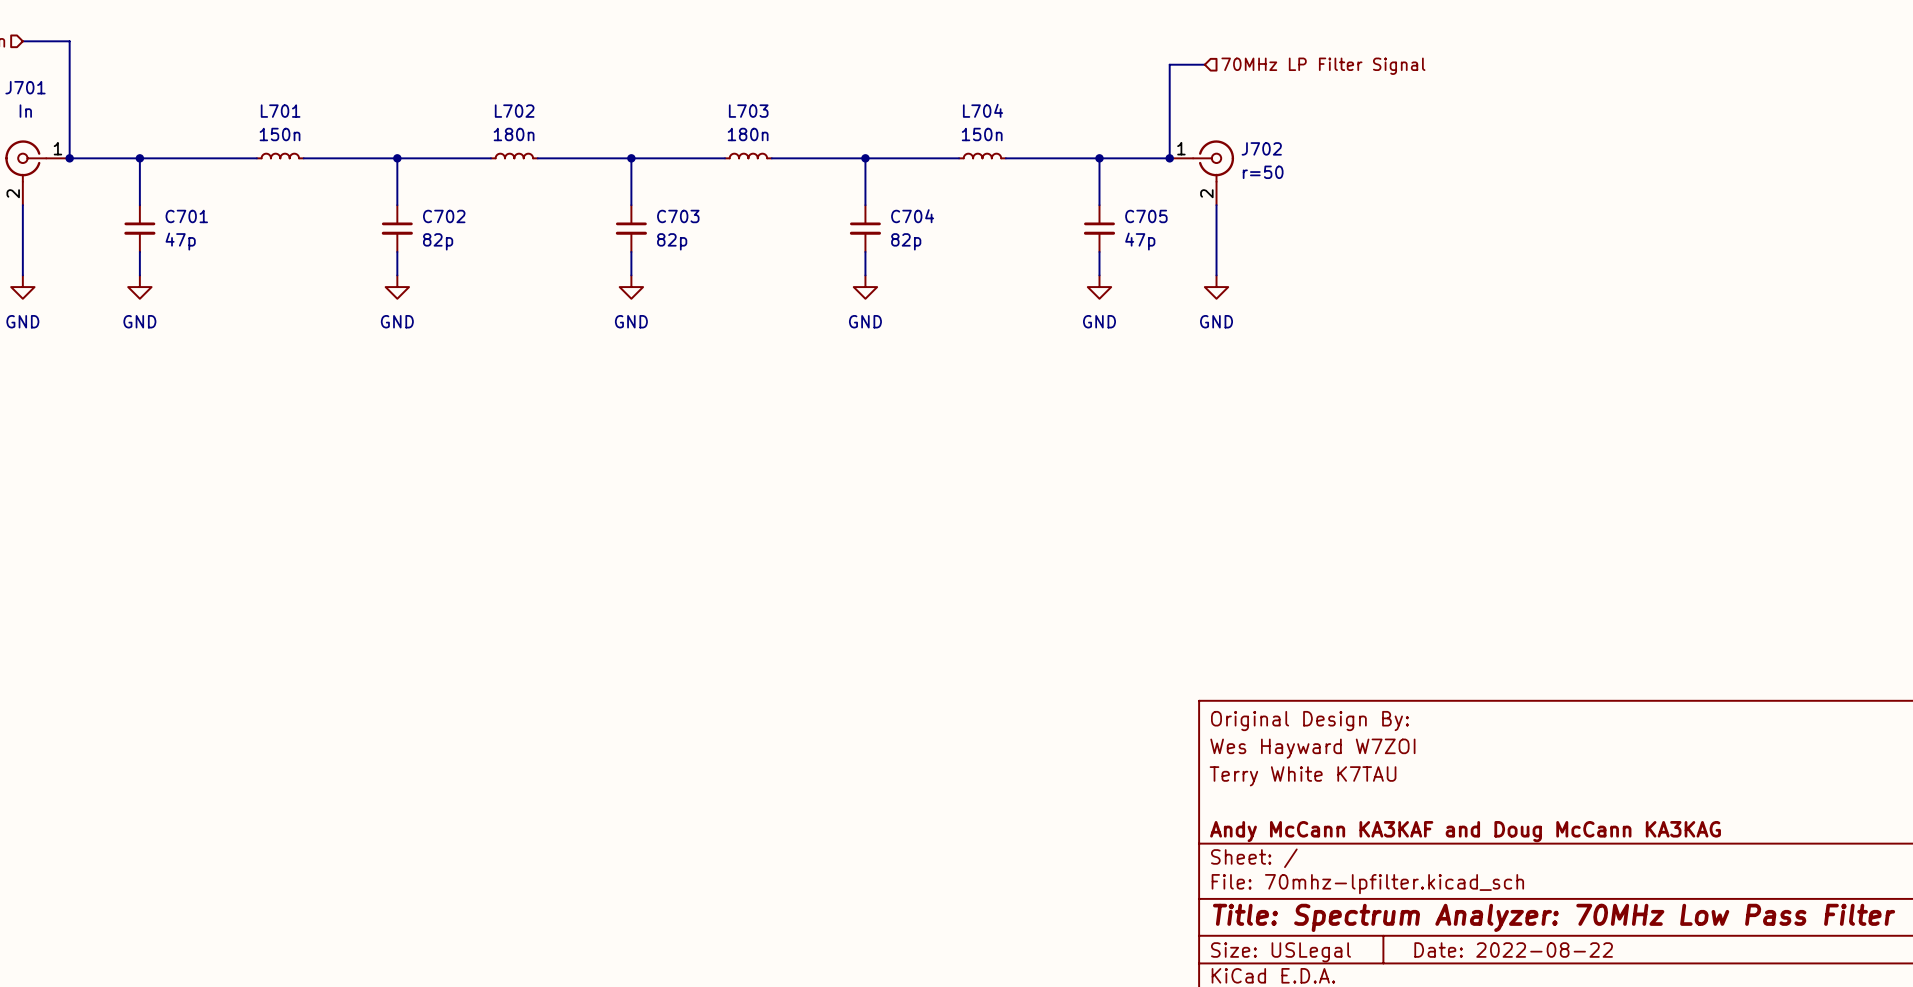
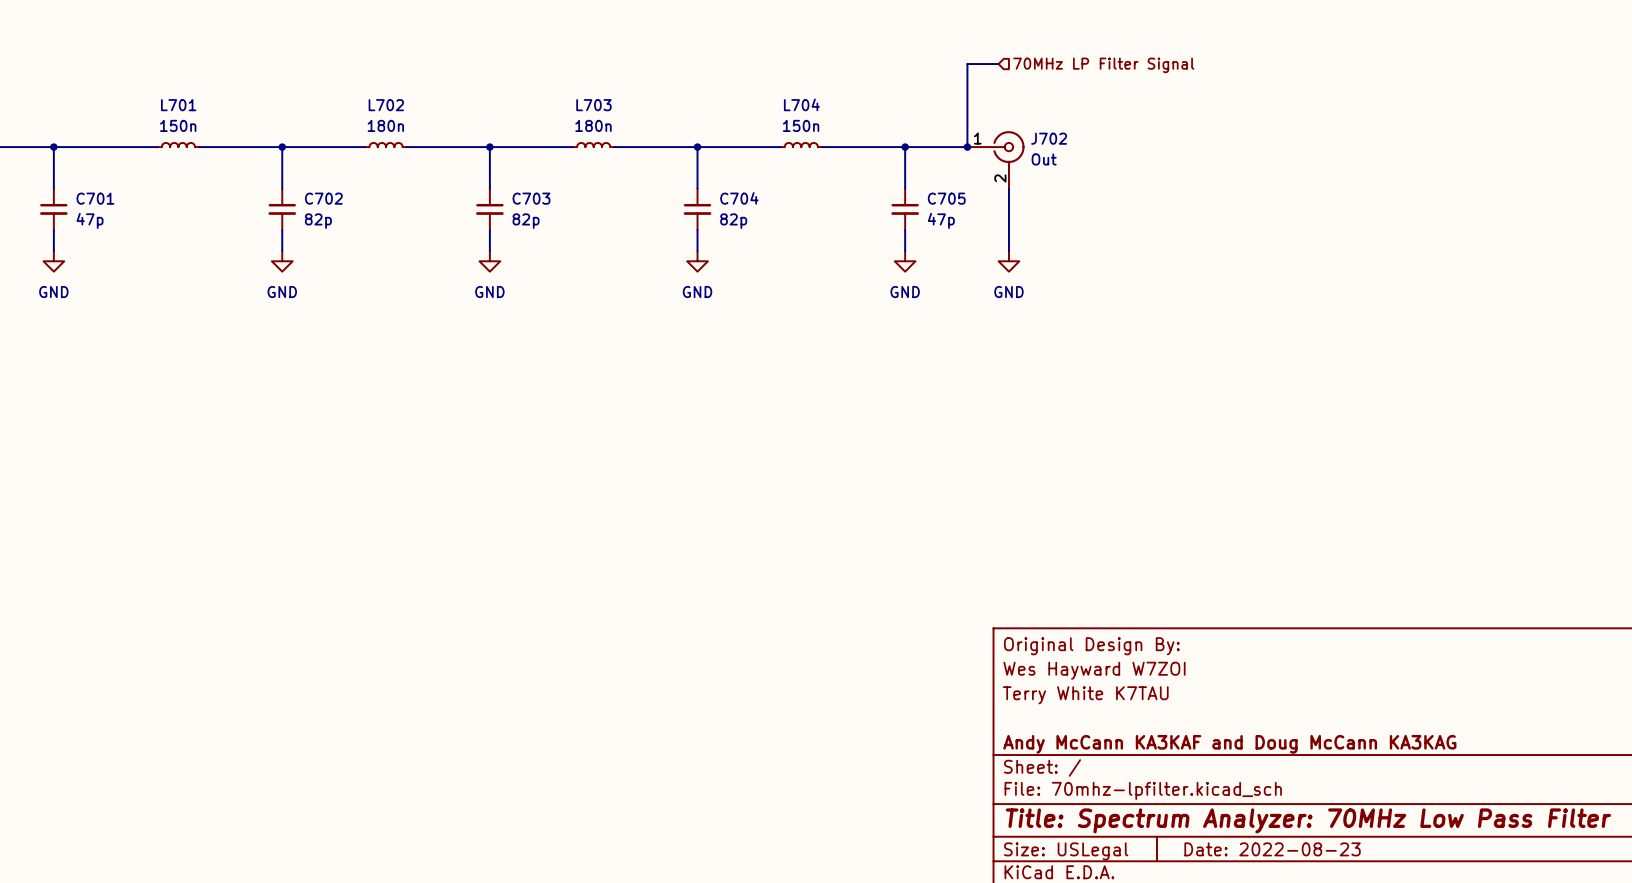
J702 value: r=50 (1263, 172) -> Out (1044, 159)
title block: Date: 2022-08-22 (1513, 950) -> Date: 2022-08-23 (1272, 849)

